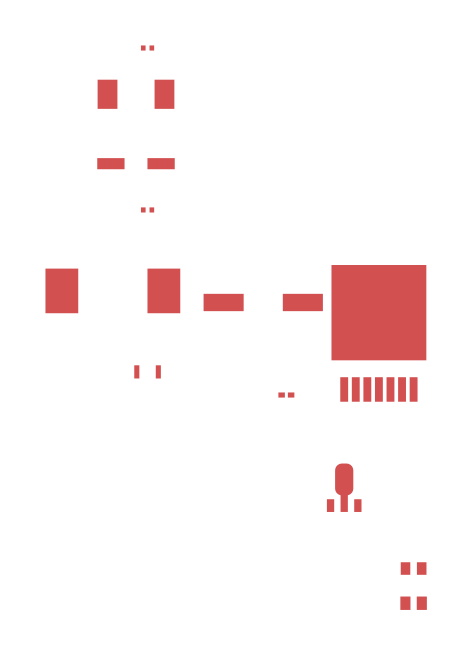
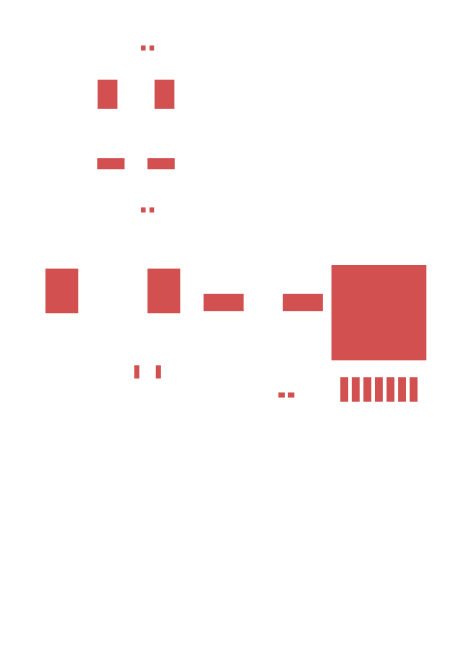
part: (344, 487) -> none
part: (413, 568) -> none
part: (413, 603) -> none

